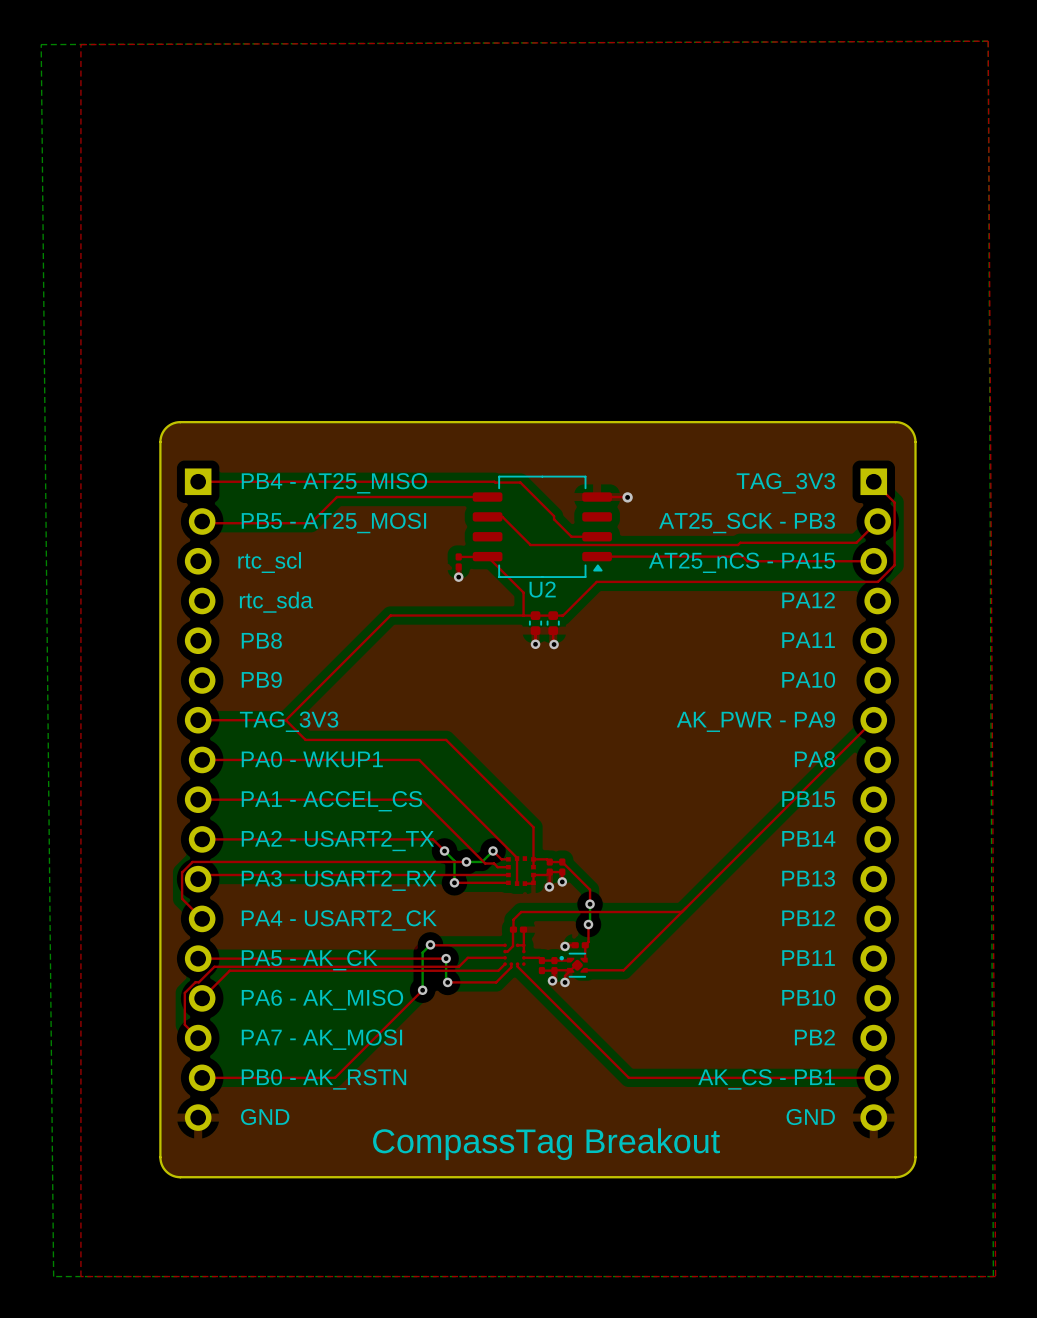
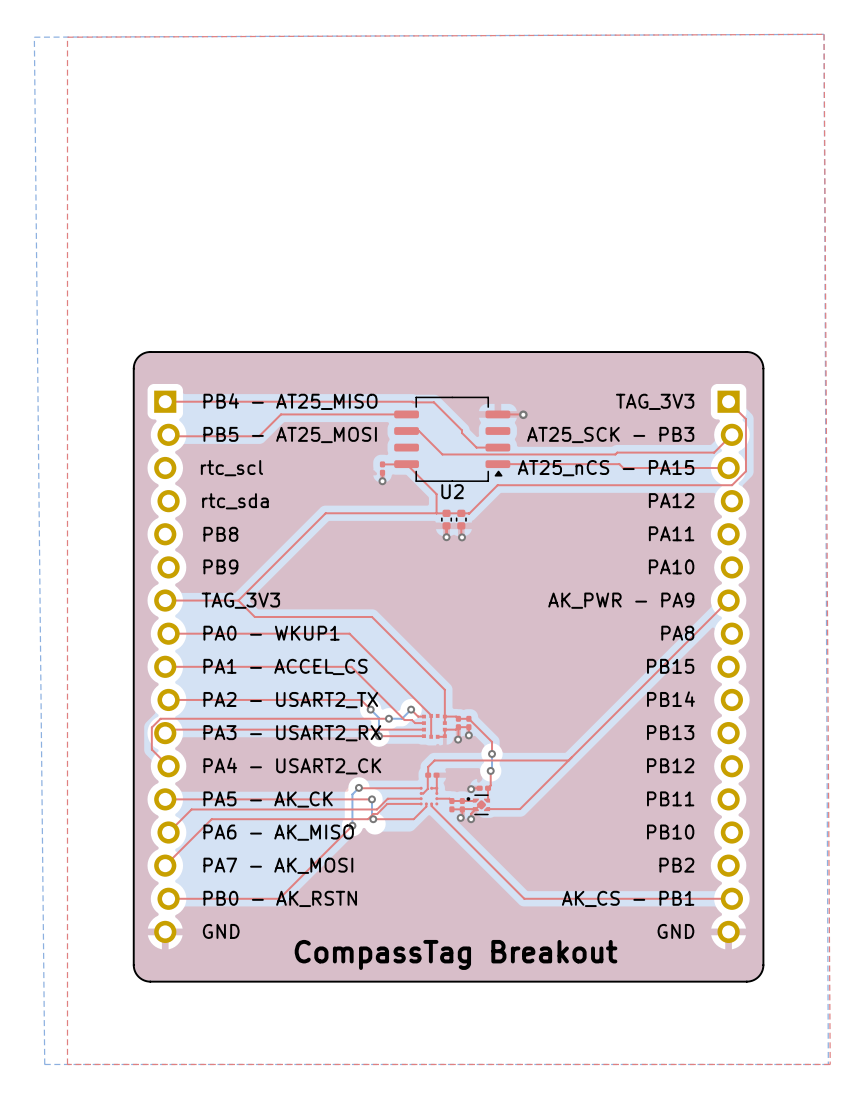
top track: (467, 957) (458, 966) (214, 966) (184, 992) (184, 1024) (198, 1038) -> (421, 803) (387, 803) (377, 813) (373, 813) (368, 819) (211, 819) (165, 865)
top track: (505, 964) (498, 970) (452, 970) -> (390, 798) (377, 809)

